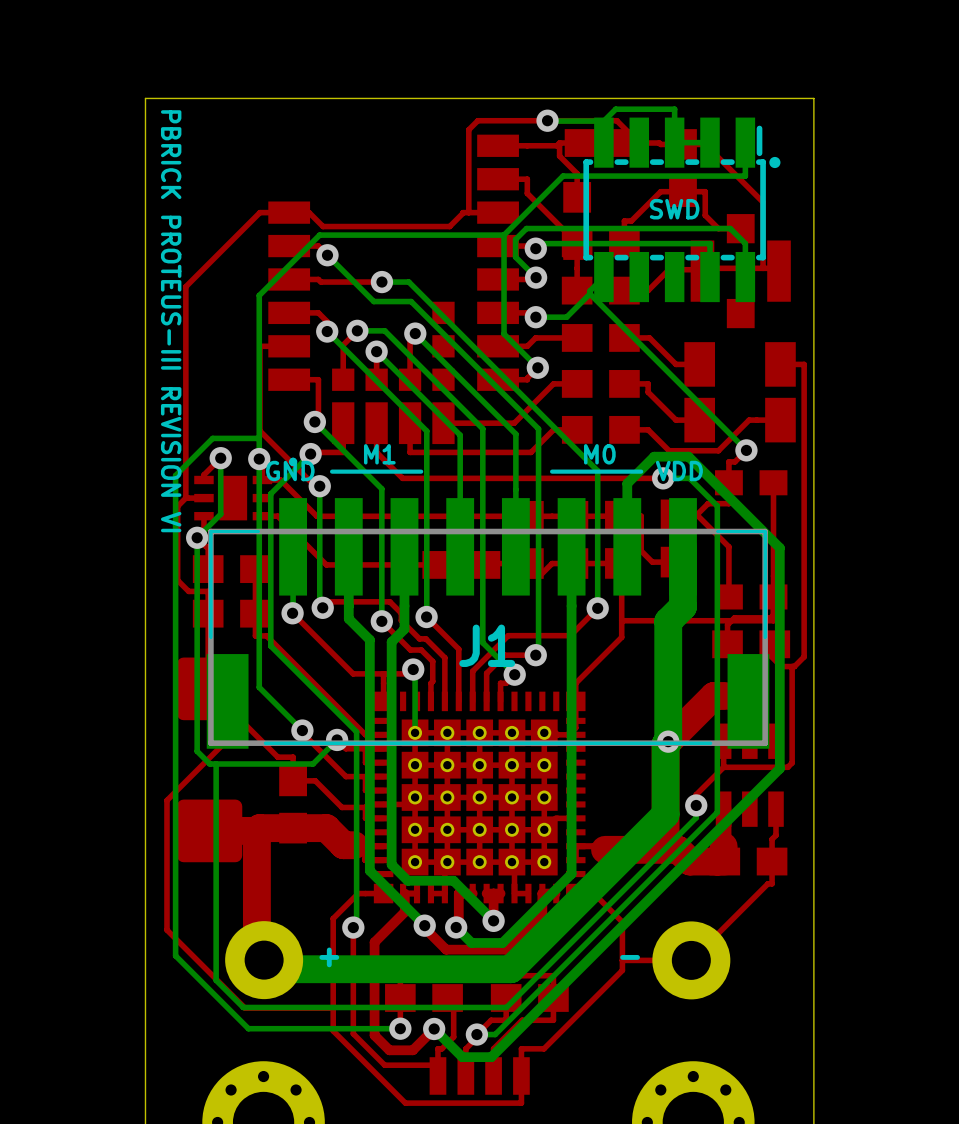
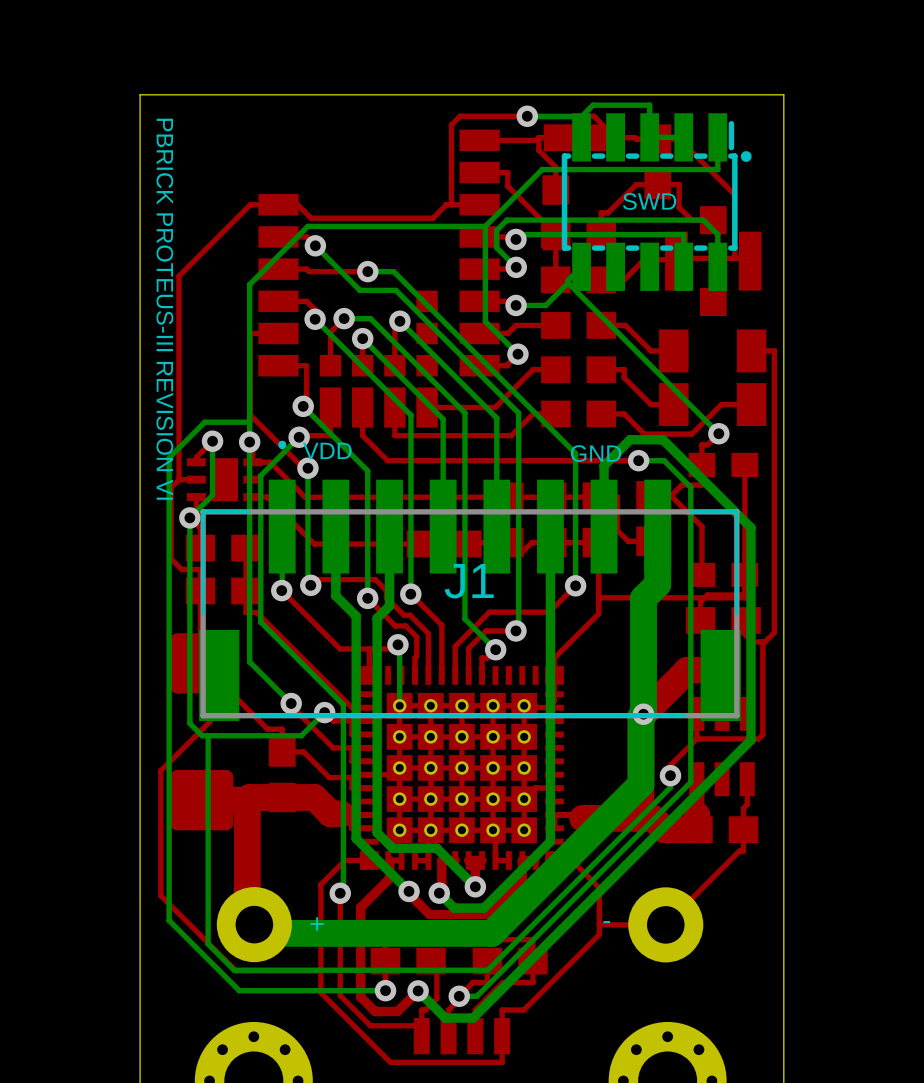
text: M1 (379, 454) -> none
text: M0 (599, 454) -> none
text position: GND (290, 471) -> GND (596, 453)
line: (421, 471) (332, 471) -> none
line: (641, 471) (552, 471) -> none
text position: VDD (679, 471) -> VDD (327, 450)
J1 name position: J1 (487, 645) -> J1 (469, 581)

